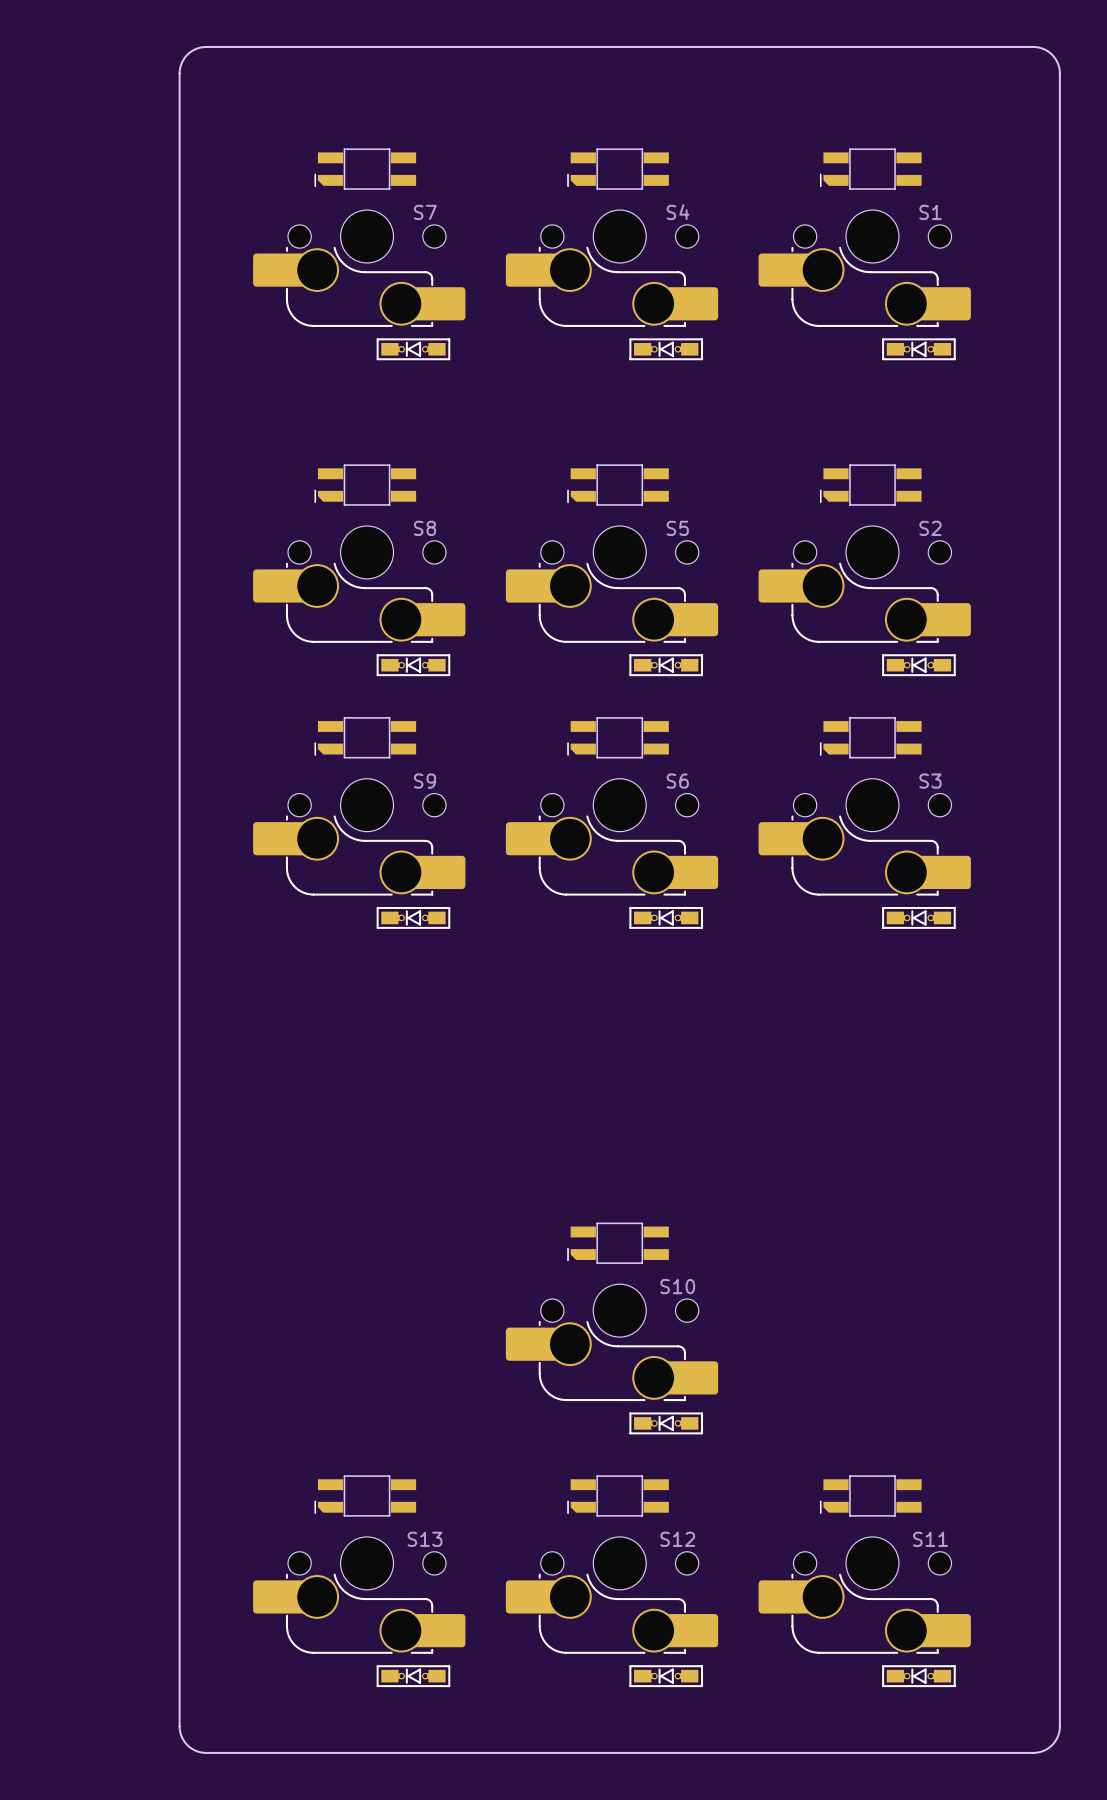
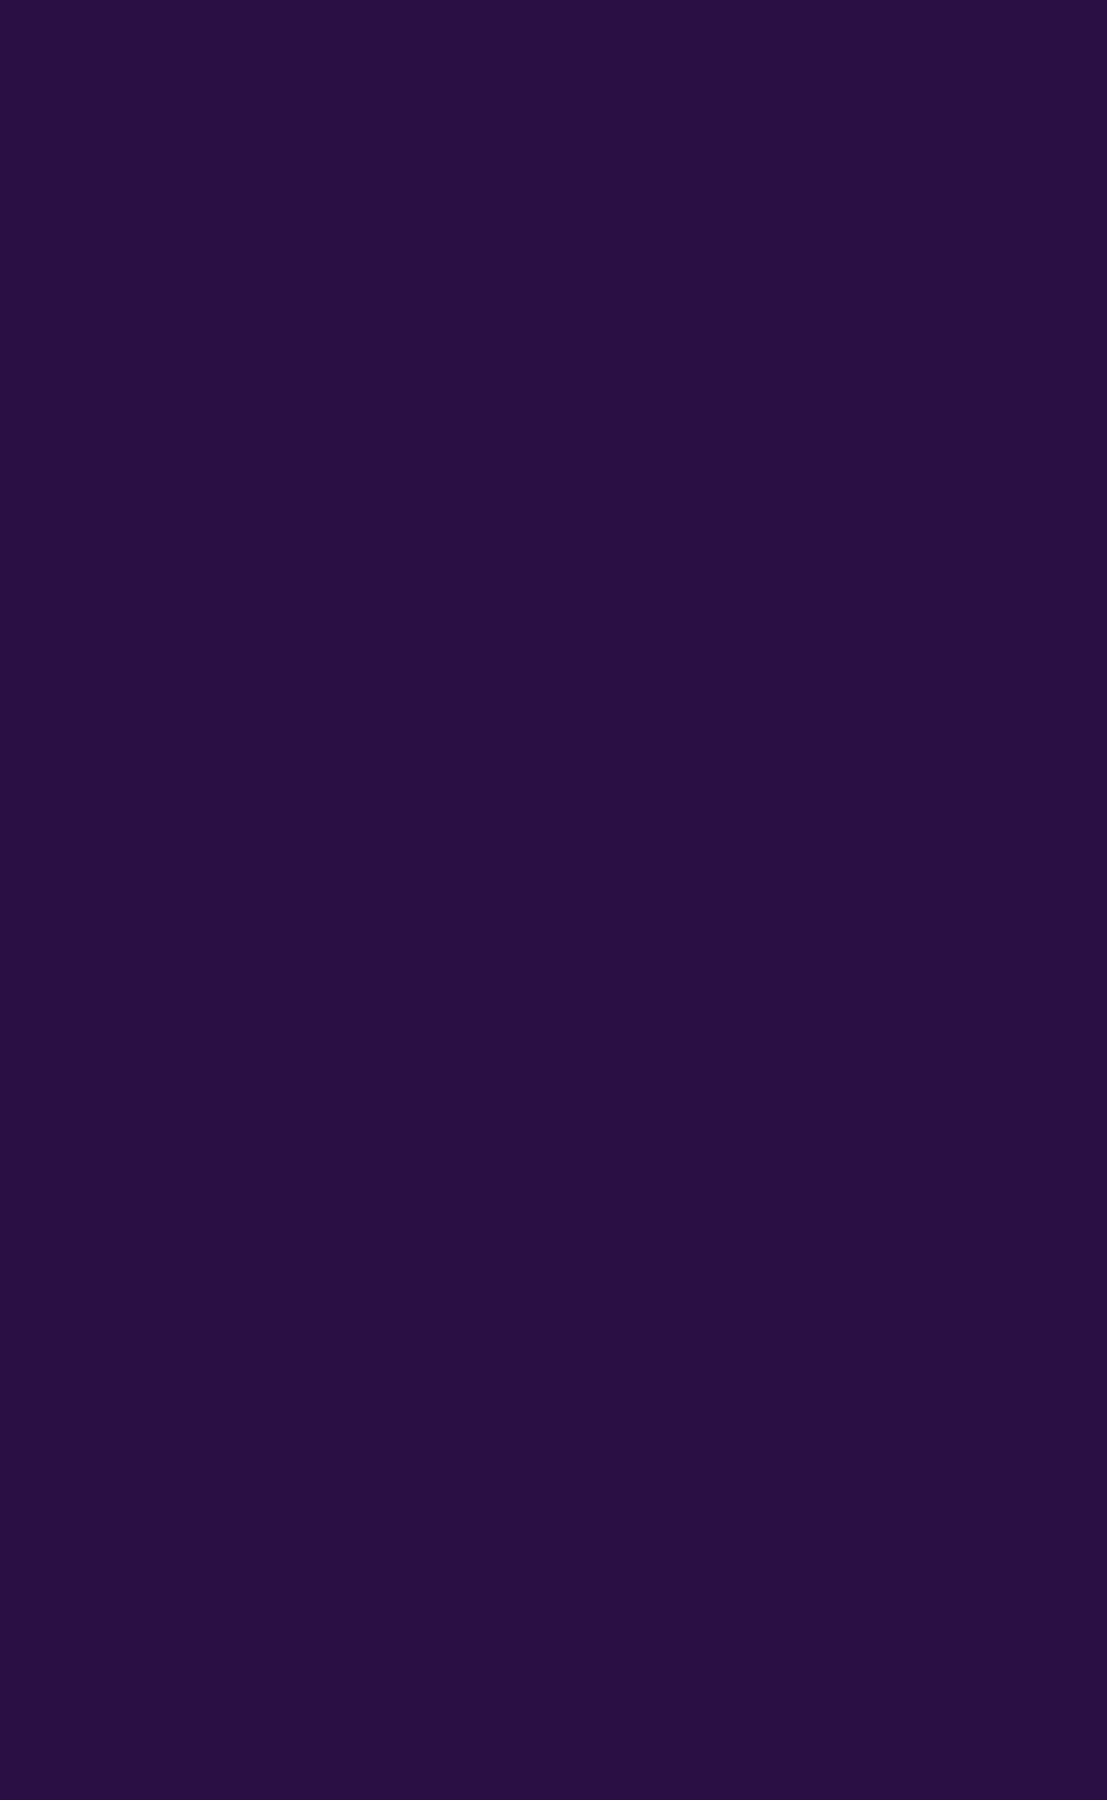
board edge: (1033, 46) (206, 46) (192, 51) (182, 61) (179, 73) (179, 1726) (183, 1740) (194, 1750) (206, 1752) (1033, 1752) (1047, 1748) (1057, 1737) (1059, 1726) (1059, 73) (1058, 64) (1052, 54) (1042, 48) (1033, 46) -> none
part: (365, 169) -> none
part: (618, 169) -> none
part: (870, 169) -> none
part: (359, 268) -> none
part: (612, 268) -> none
part: (864, 268) -> none
part: (413, 349) -> none
part: (666, 349) -> none
part: (918, 349) -> none
part: (365, 485) -> none
part: (618, 485) -> none
part: (870, 485) -> none
part: (359, 584) -> none
part: (612, 584) -> none
part: (864, 584) -> none
part: (413, 665) -> none
part: (666, 665) -> none
part: (918, 665) -> none
part: (365, 737) -> none
part: (618, 737) -> none
part: (870, 737) -> none
part: (359, 837) -> none
part: (612, 837) -> none
part: (864, 837) -> none
part: (413, 917) -> none
part: (666, 917) -> none
part: (918, 917) -> none
part: (618, 1243) -> none
part: (612, 1342) -> none
part: (666, 1423) -> none
part: (365, 1495) -> none
part: (618, 1495) -> none
part: (870, 1495) -> none
part: (359, 1595) -> none
part: (612, 1595) -> none
part: (864, 1595) -> none
part: (413, 1676) -> none
part: (666, 1676) -> none
part: (918, 1676) -> none

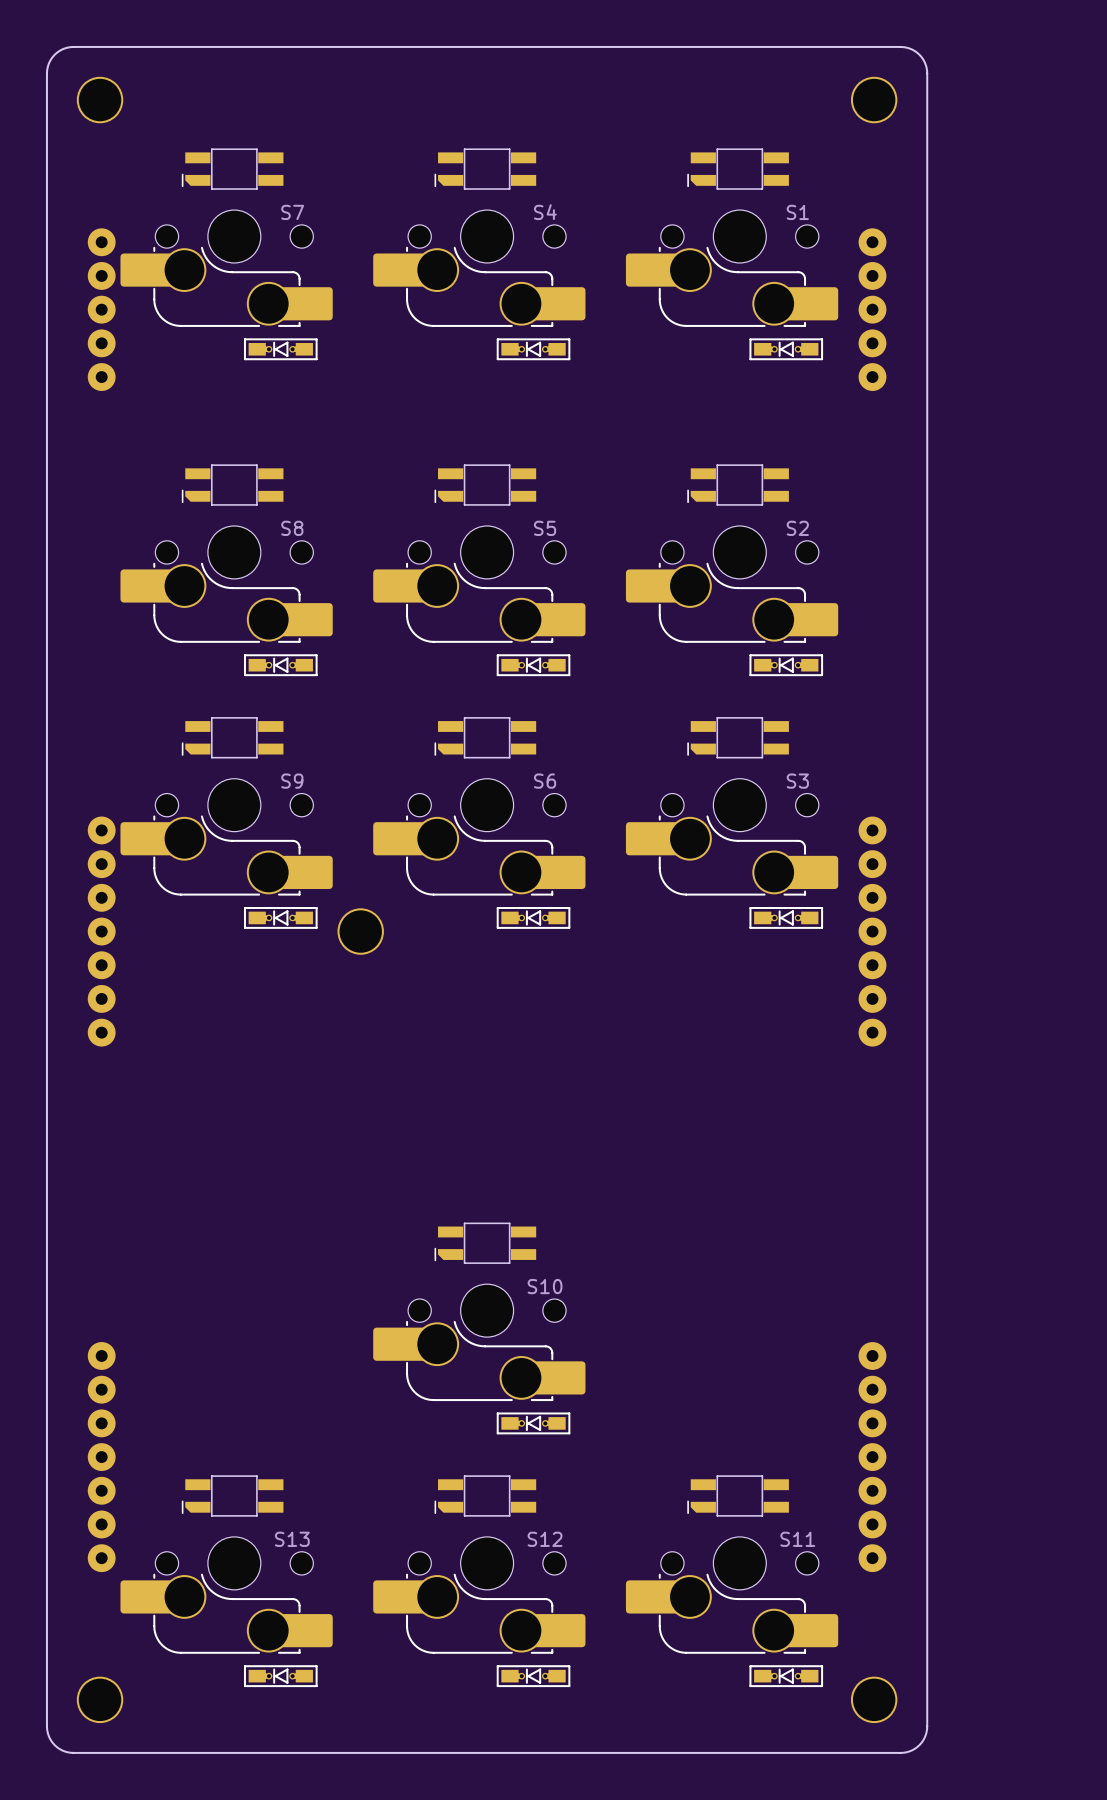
board edge: none -> (900, 46) (73, 46) (59, 51) (49, 61) (46, 73) (46, 1726) (51, 1740) (61, 1750) (73, 1752) (900, 1752) (914, 1748) (924, 1737) (927, 1726) (927, 73) (924, 61) (919, 54) (909, 48) (900, 46)
part: none -> (100, 100)
part: none -> (874, 100)
part: none -> (232, 169)
part: none -> (485, 169)
part: none -> (738, 169)
part: none -> (226, 268)
part: none -> (479, 268)
part: none -> (732, 268)
part: none -> (101, 309)
part: none -> (872, 309)
part: none -> (280, 349)
part: none -> (533, 349)
part: none -> (786, 349)
part: none -> (232, 485)
part: none -> (485, 485)
part: none -> (738, 485)
part: none -> (226, 584)
part: none -> (479, 584)
part: none -> (732, 584)
part: none -> (280, 665)
part: none -> (533, 665)
part: none -> (786, 665)
part: none -> (232, 737)
part: none -> (485, 737)
part: none -> (738, 737)
part: none -> (226, 837)
part: none -> (479, 837)
part: none -> (732, 837)
part: none -> (280, 917)
part: none -> (533, 917)
part: none -> (786, 917)
part: none -> (101, 931)
part: none -> (360, 931)
part: none -> (872, 931)
part: none -> (485, 1243)
part: none -> (479, 1342)
part: none -> (533, 1423)
part: none -> (101, 1457)
part: none -> (872, 1457)
part: none -> (232, 1495)
part: none -> (485, 1495)
part: none -> (738, 1495)
part: none -> (226, 1595)
part: none -> (479, 1595)
part: none -> (732, 1595)
part: none -> (280, 1676)
part: none -> (533, 1676)
part: none -> (786, 1676)
part: none -> (100, 1699)
part: none -> (874, 1699)

